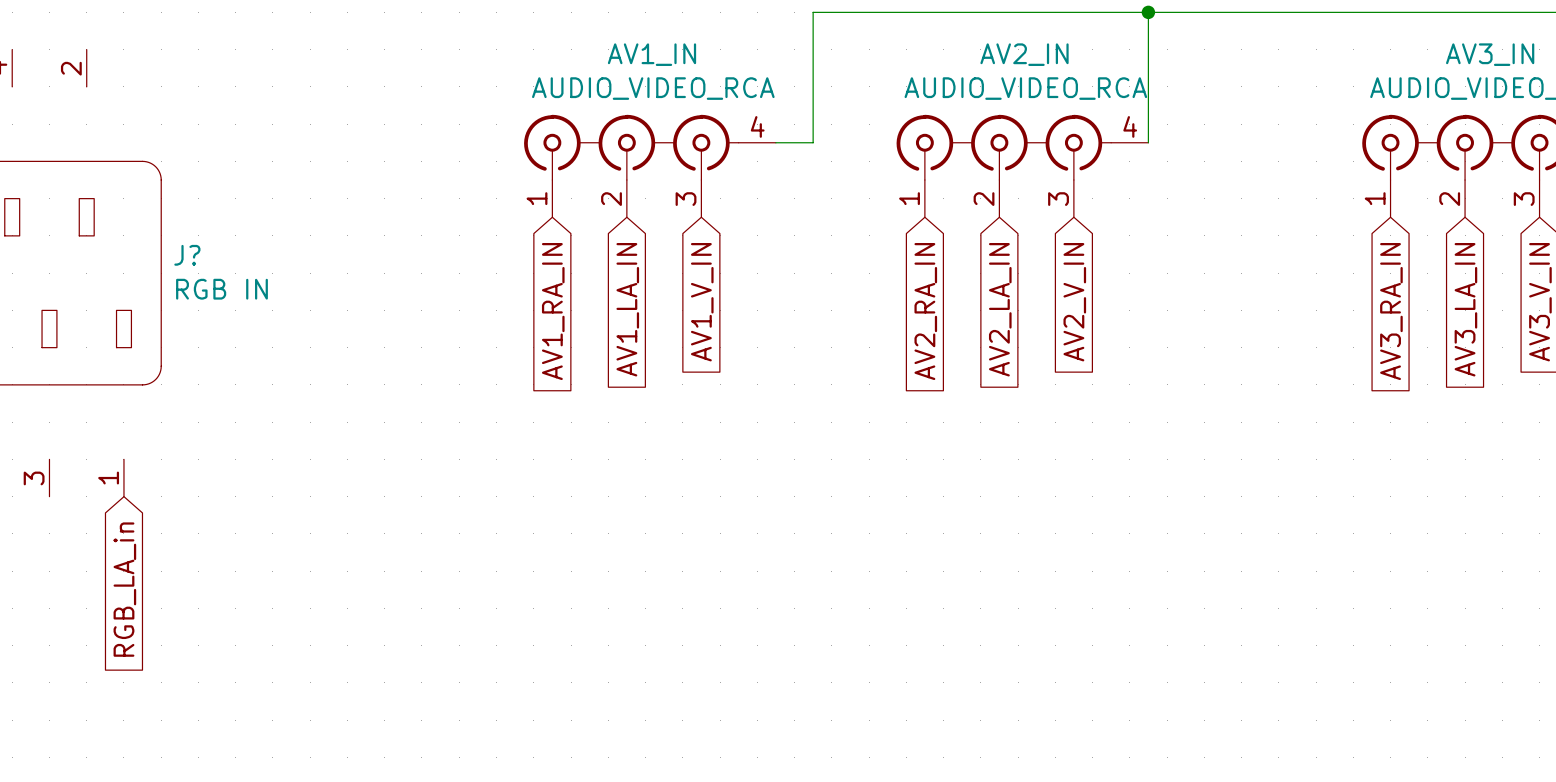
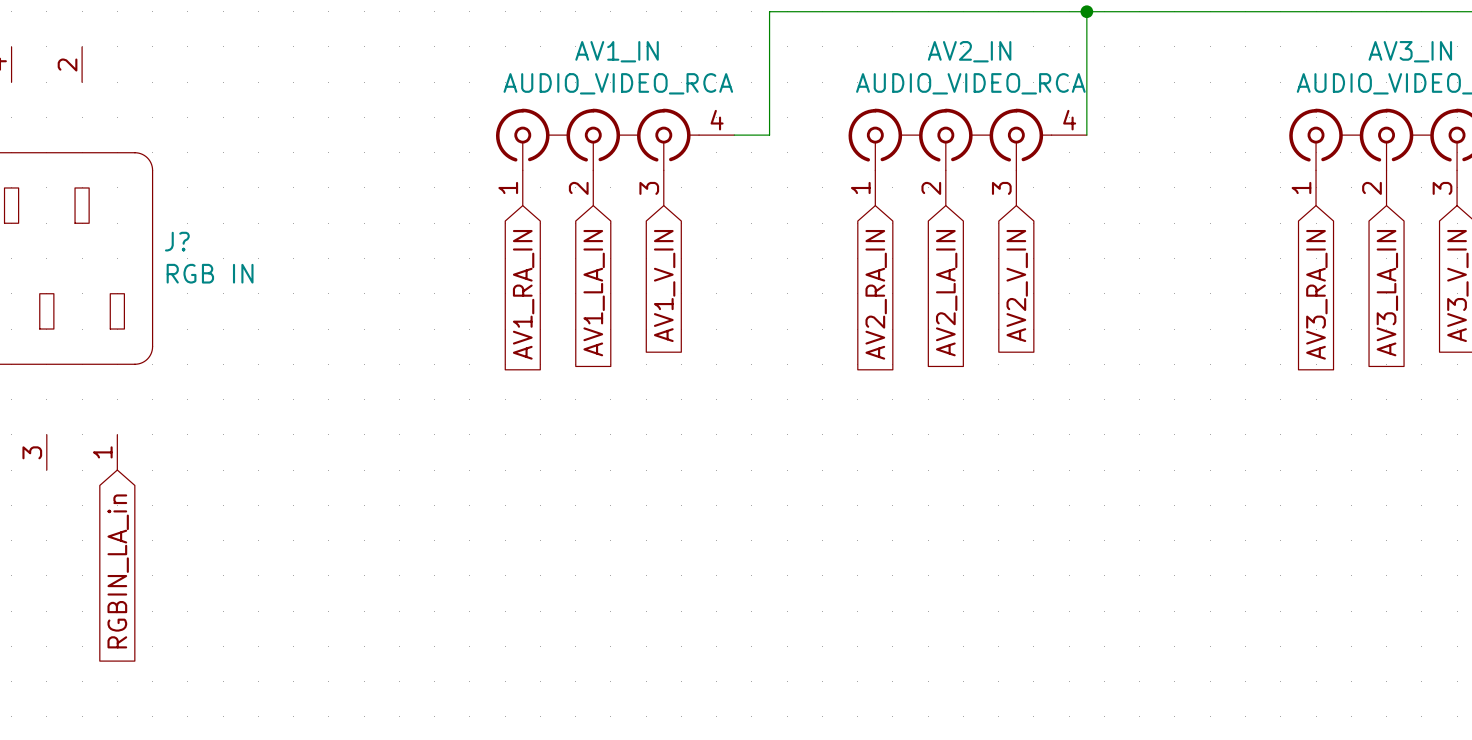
global label: RGB_LA_in (124, 589) -> RGBIN_LA_in (118, 571)

